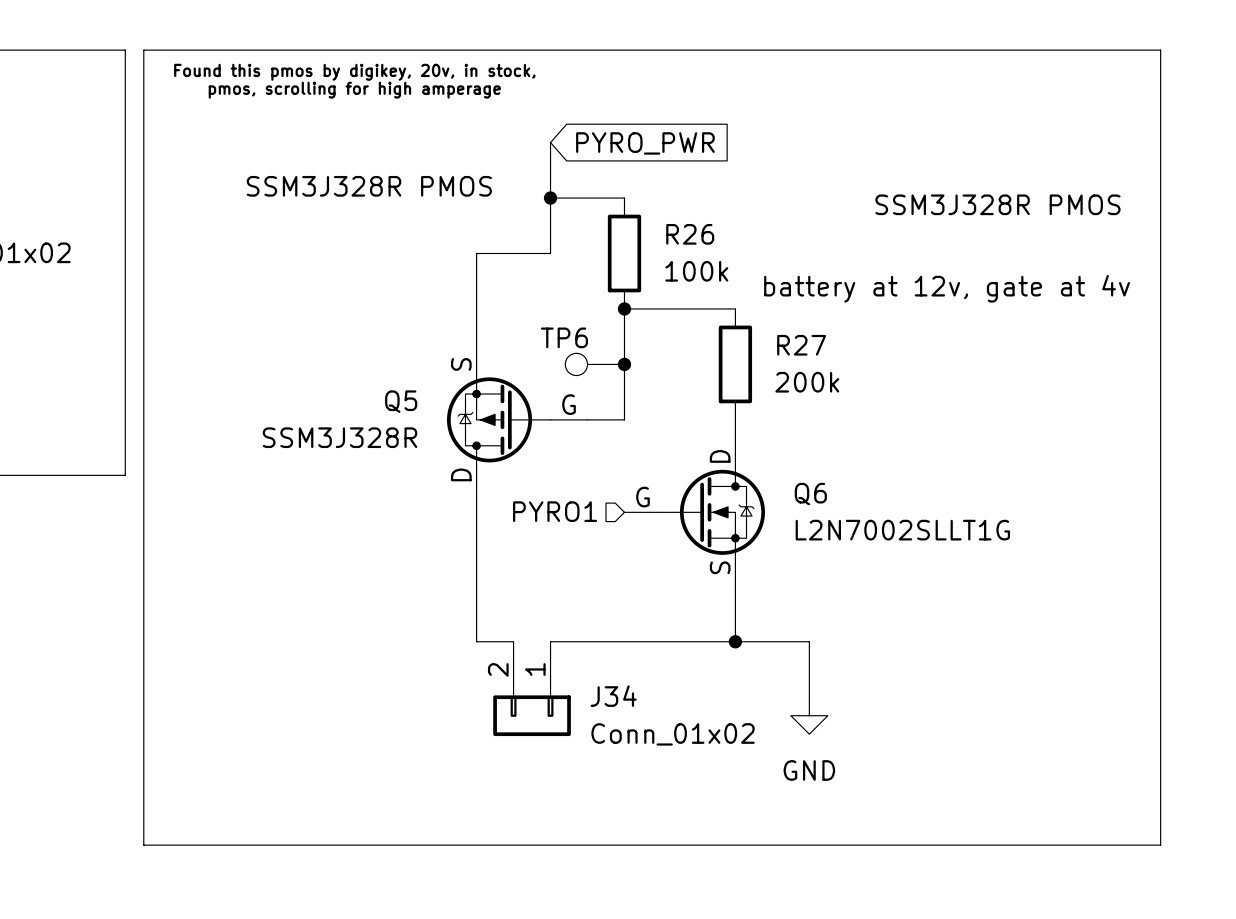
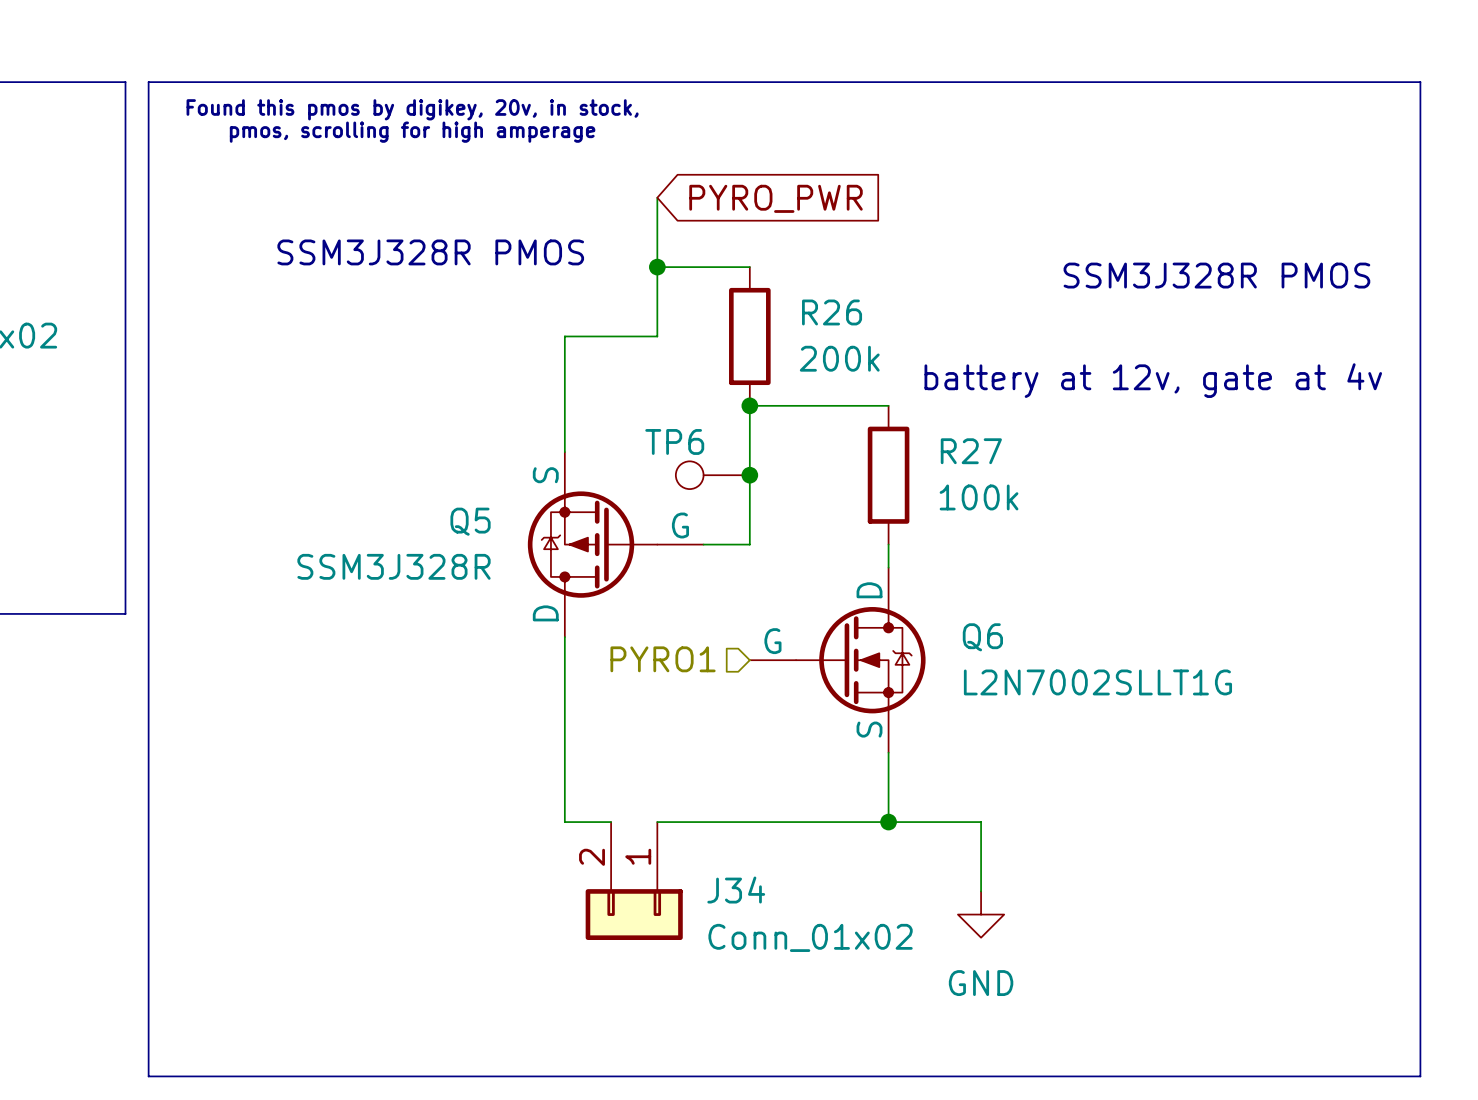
R26 value: 100k (696, 271) -> 200k (839, 358)
R27 value: 200k (807, 382) -> 100k (979, 497)

